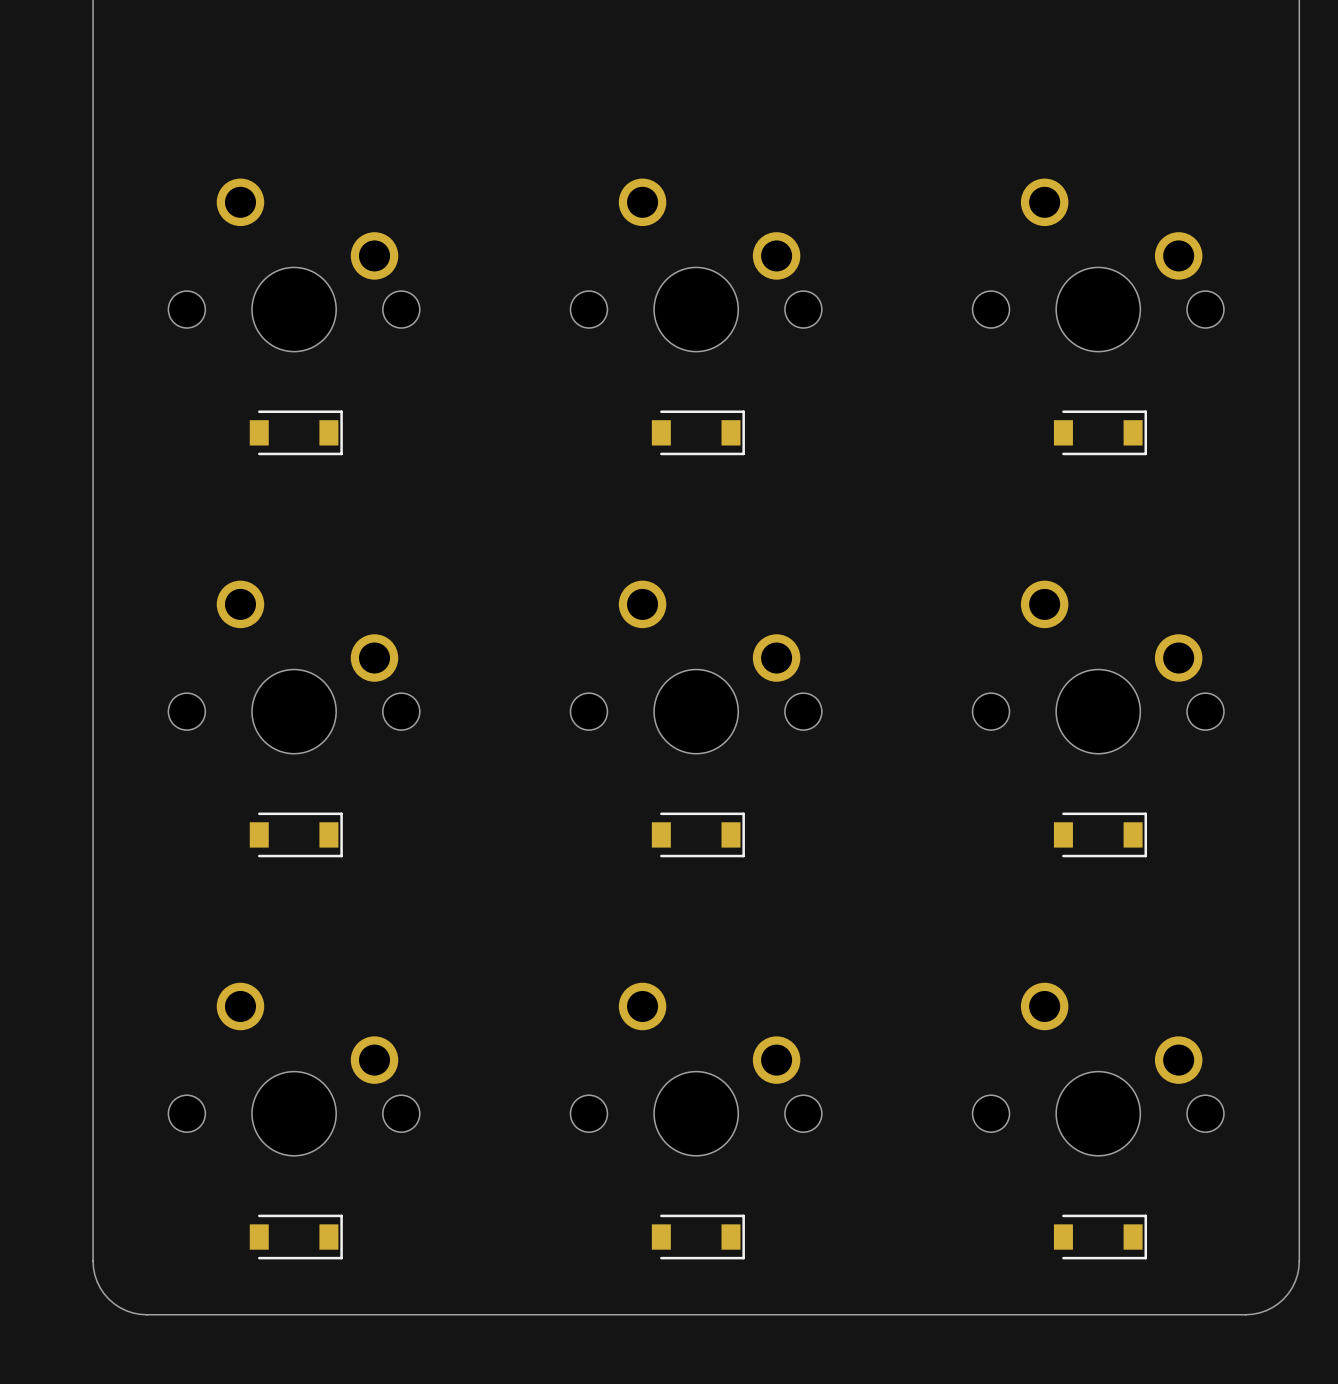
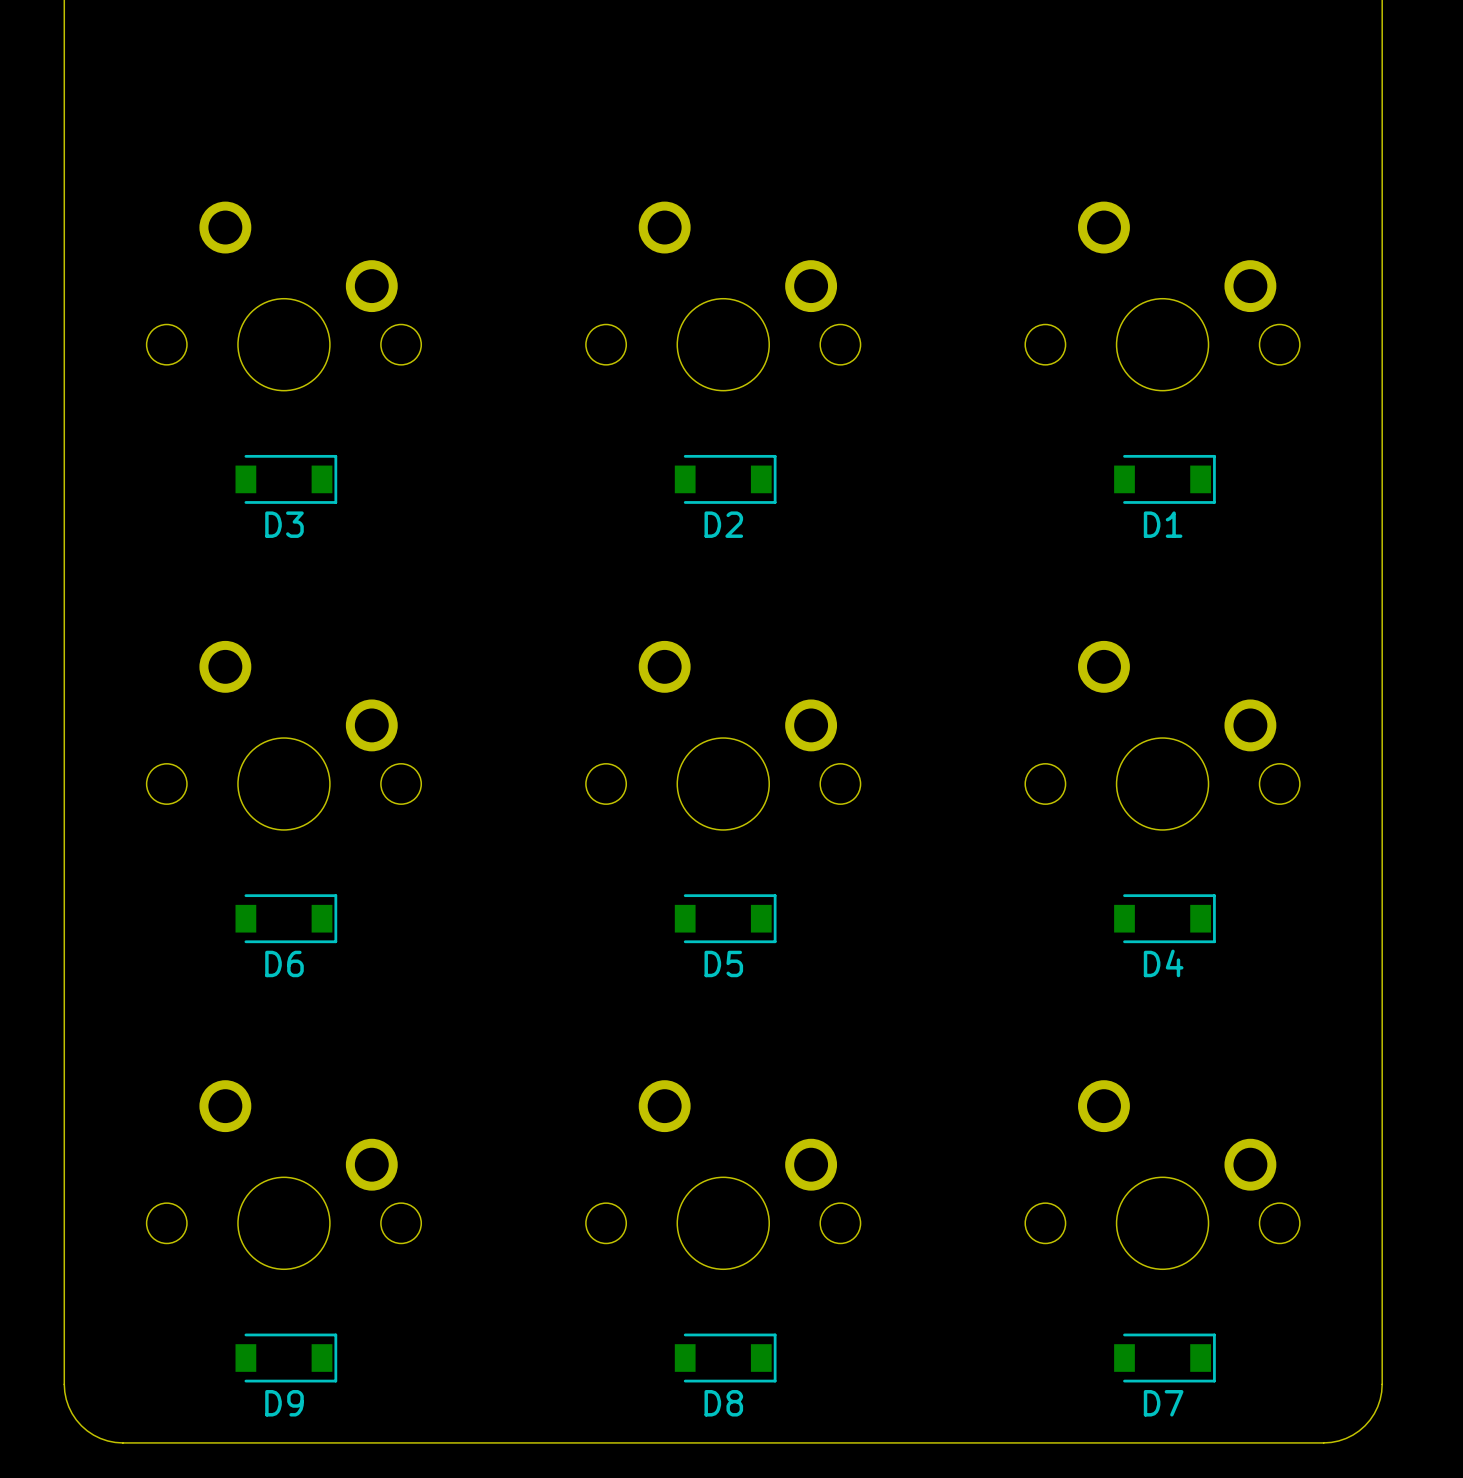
D3 name: none -> D3 (284, 524)
D2 name: none -> D2 (723, 524)
D1 name: none -> D1 (1163, 524)
D4 name: none -> D4 (1163, 963)
D6 name: none -> D6 (284, 963)
D5 name: none -> D5 (723, 963)
D9 name: none -> D9 (284, 1403)
D8 name: none -> D8 (723, 1403)
D7 name: none -> D7 (1163, 1403)

